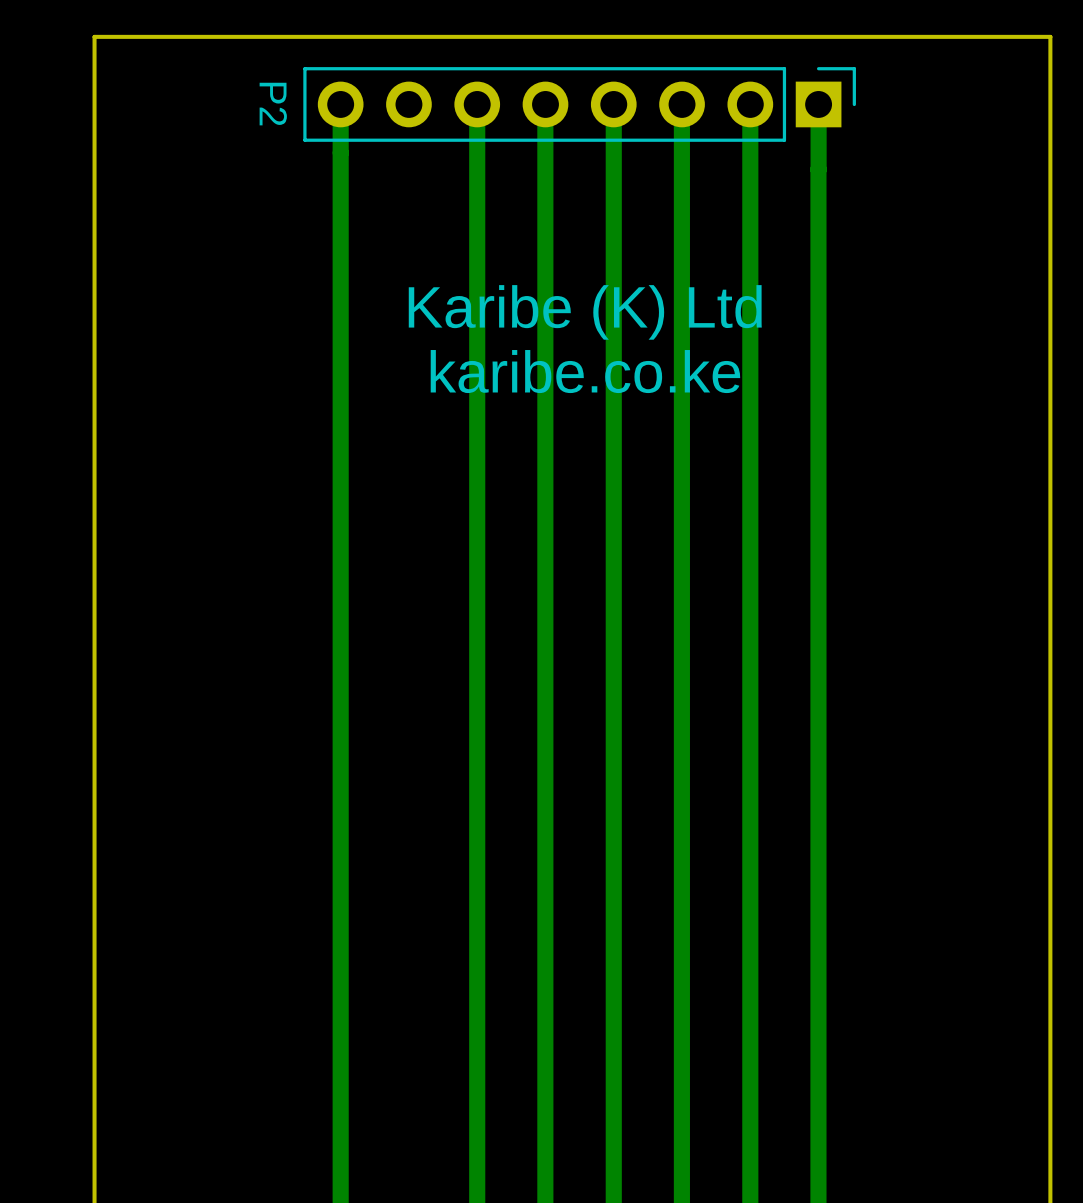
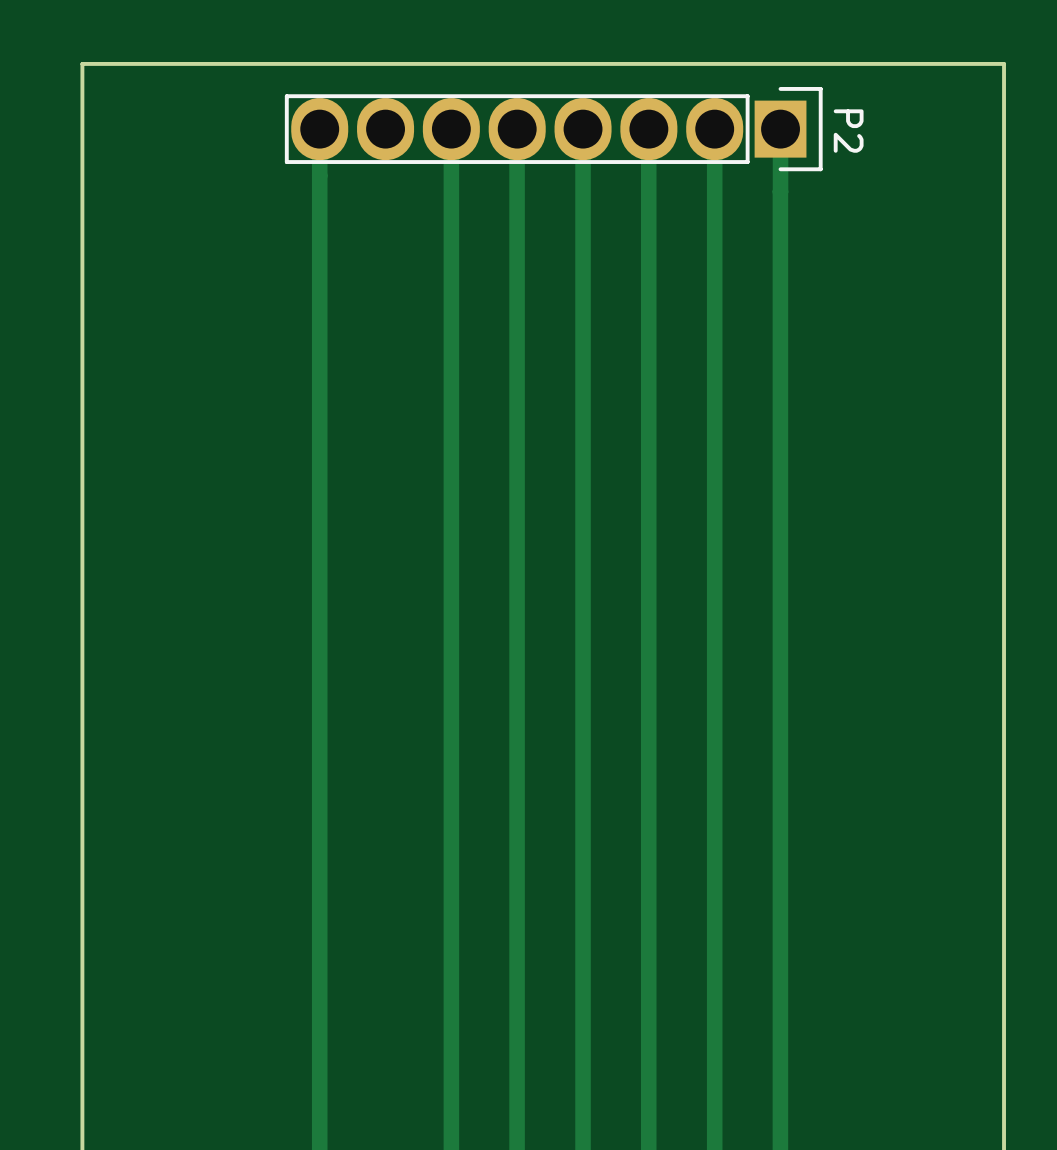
P2 footprint: [303, 67, 856, 142] -> [284, 87, 823, 172]
P2 name position: P2 (273, 104) -> P2 (848, 131)
text: Karibe (K) Ltd (585, 312) -> none
text: karibe.co.ke (585, 371) -> none

